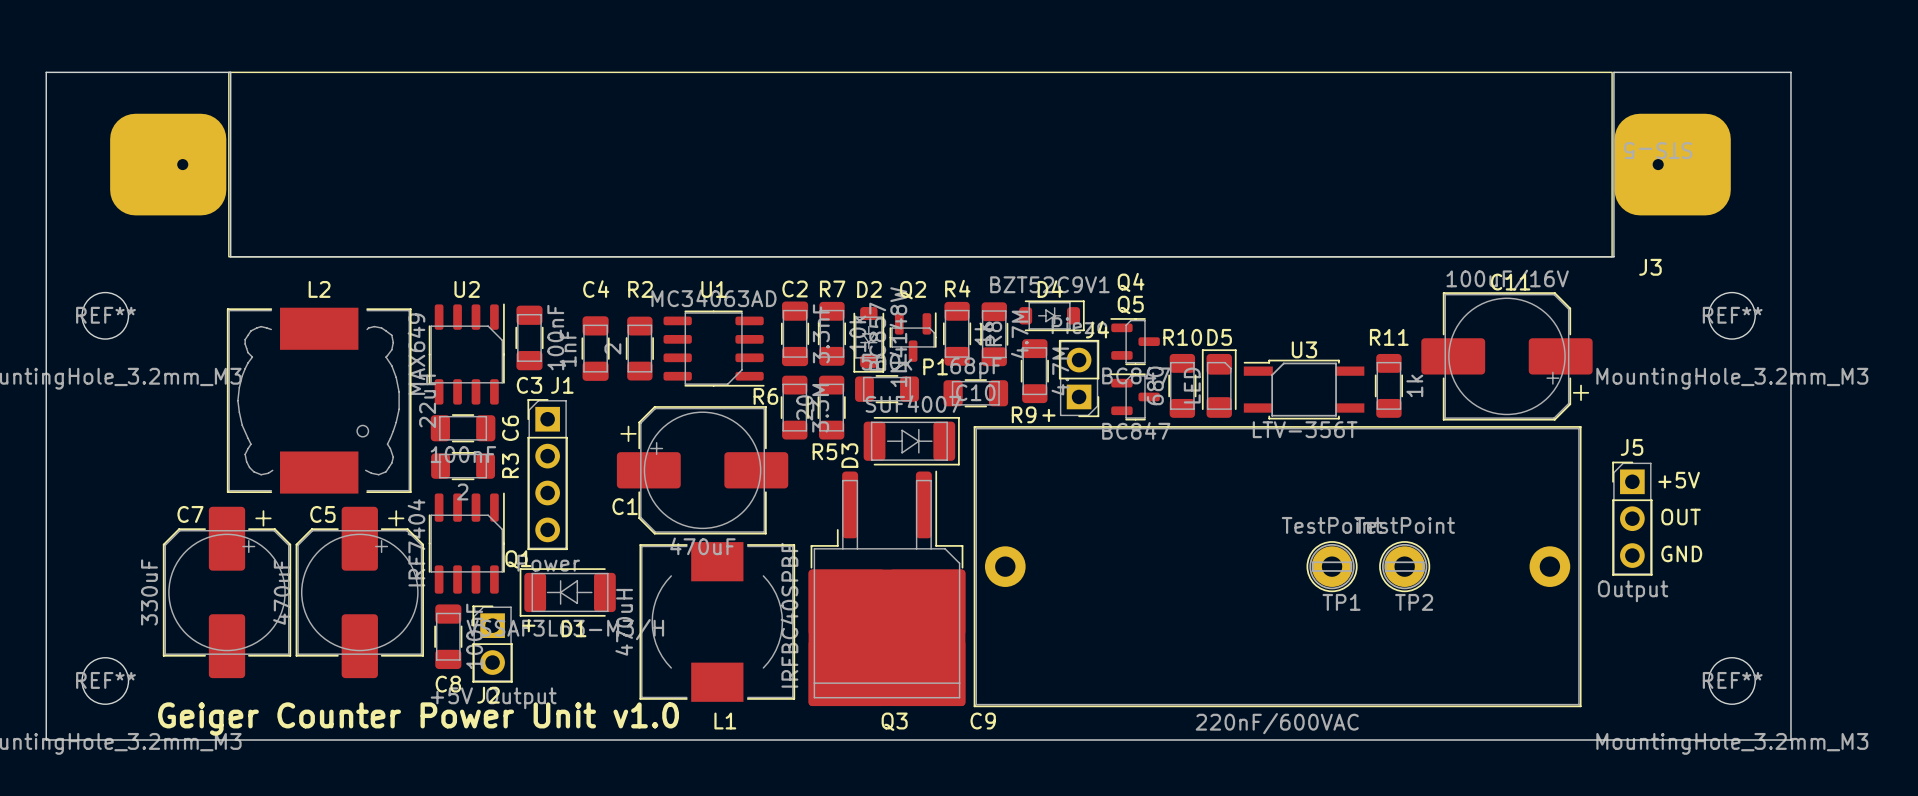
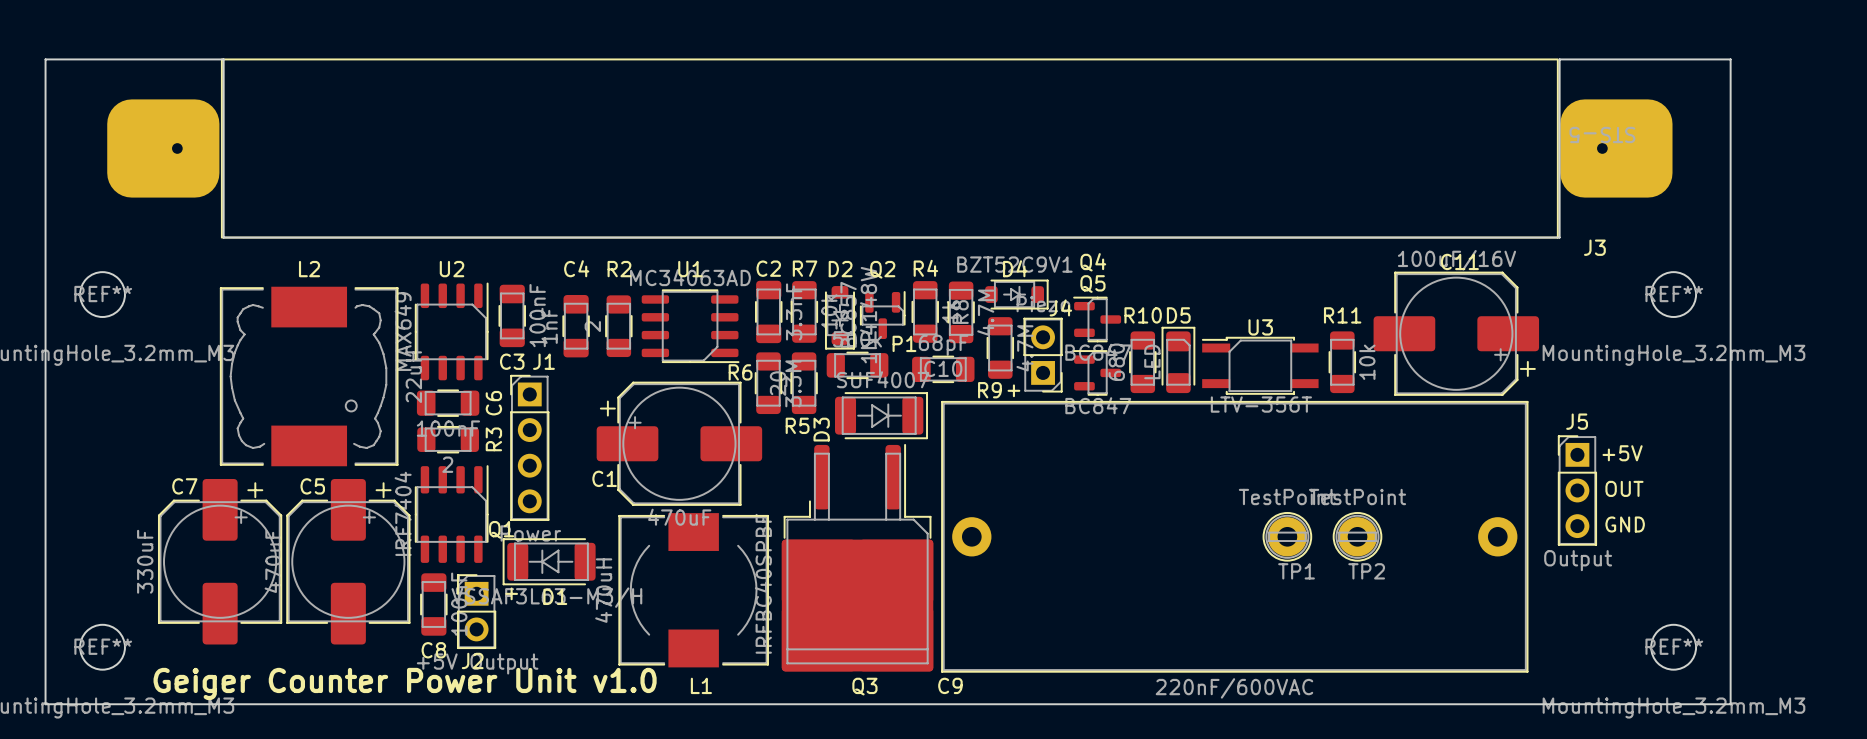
R11 value: 1k (1414, 385) -> 10k (1367, 362)

